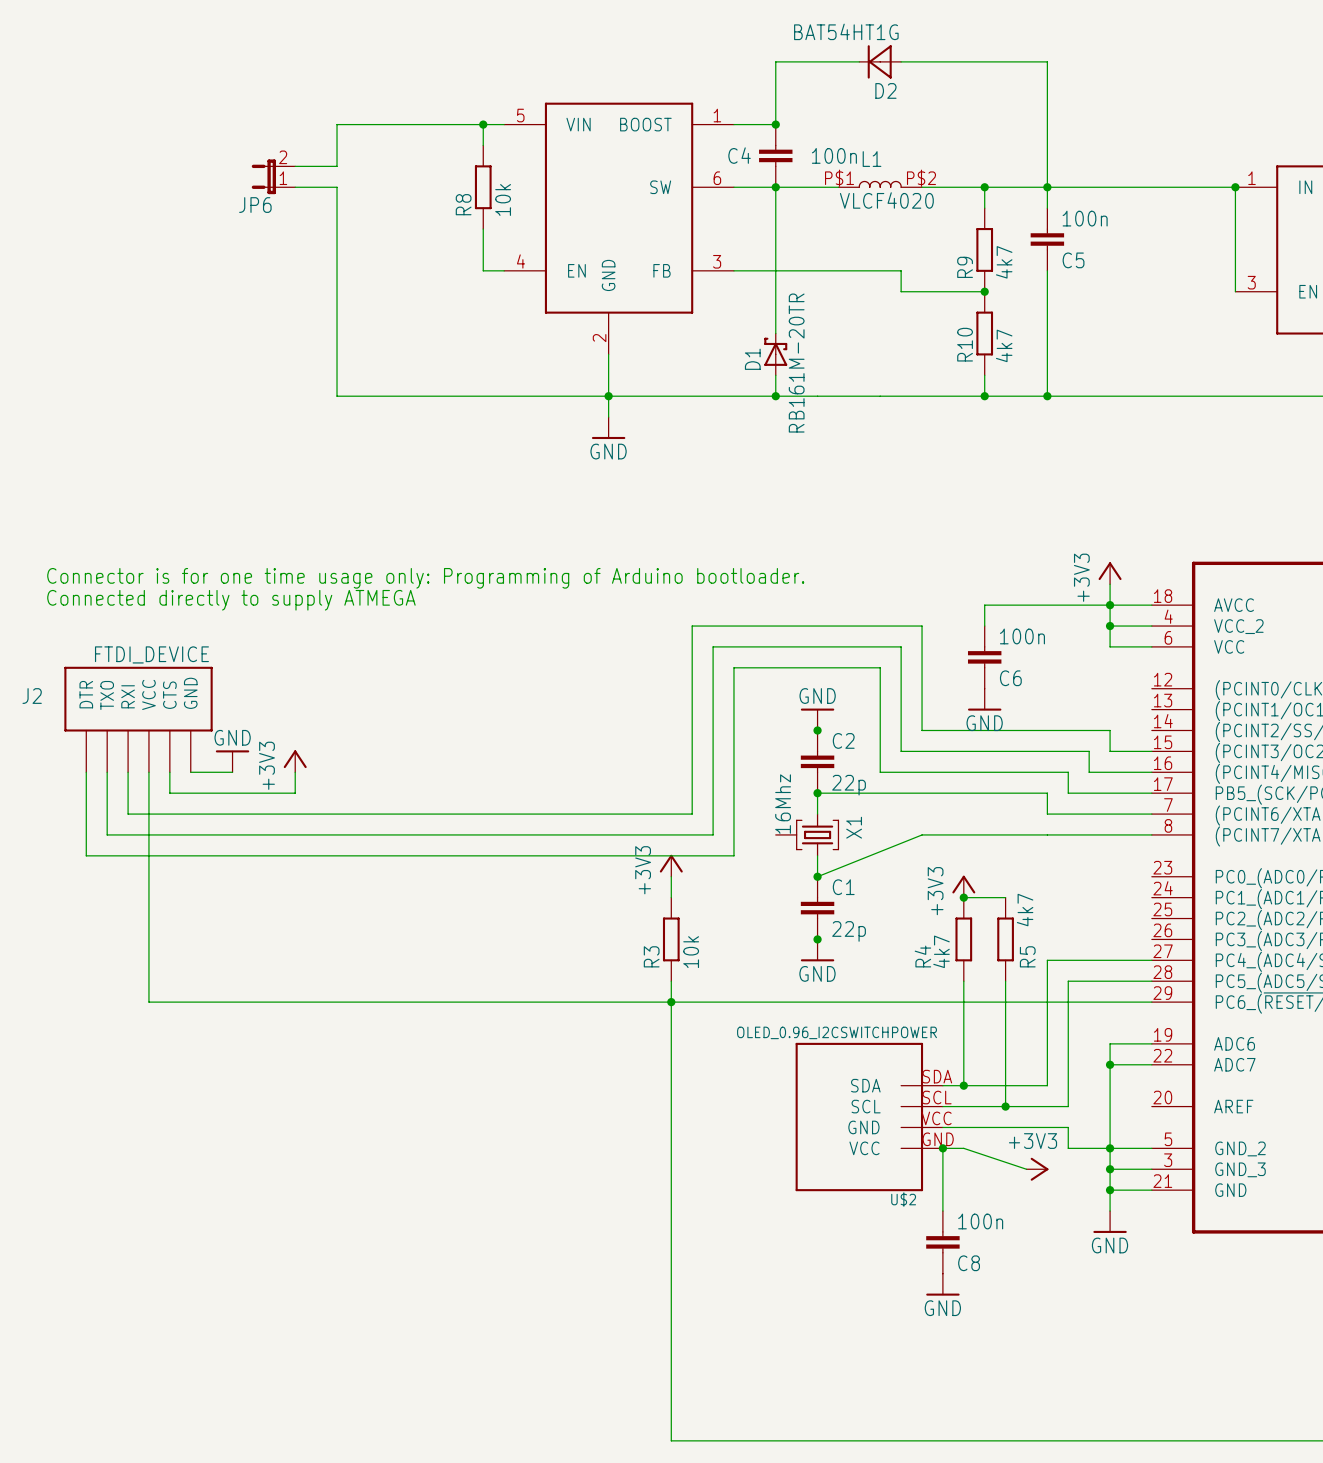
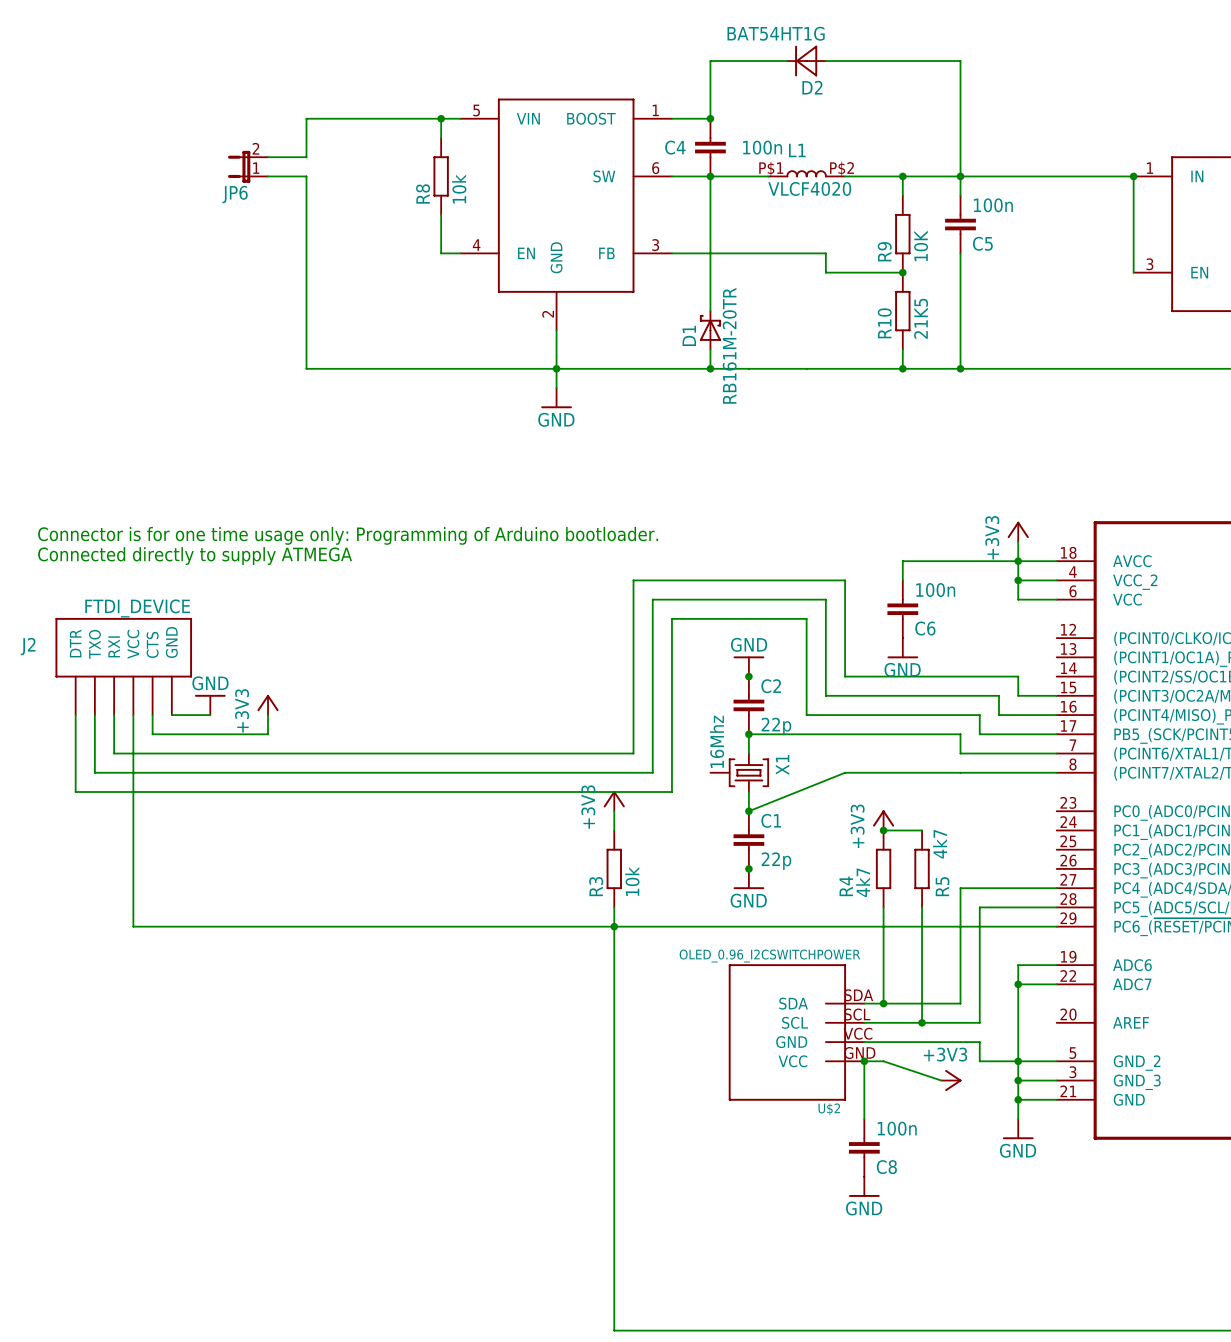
R9 value: 4k7 (1004, 262) -> 10K (921, 245)
R10 value: 4k7 (1004, 345) -> 21K5 (921, 318)

